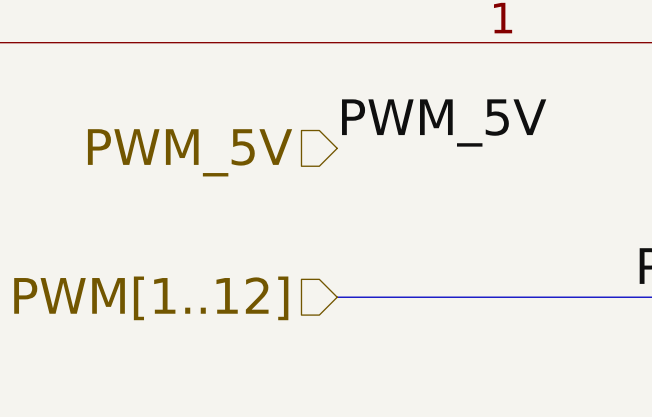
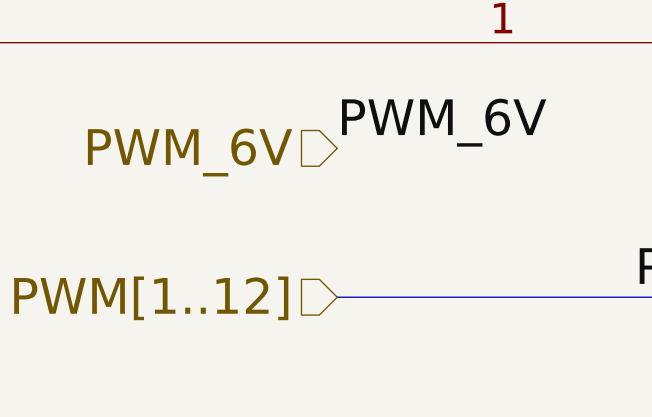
label: PWM_5V (444, 122) -> PWM_6V (444, 122)
hierarchical label: PWM_5V (190, 152) -> PWM_6V (190, 152)

